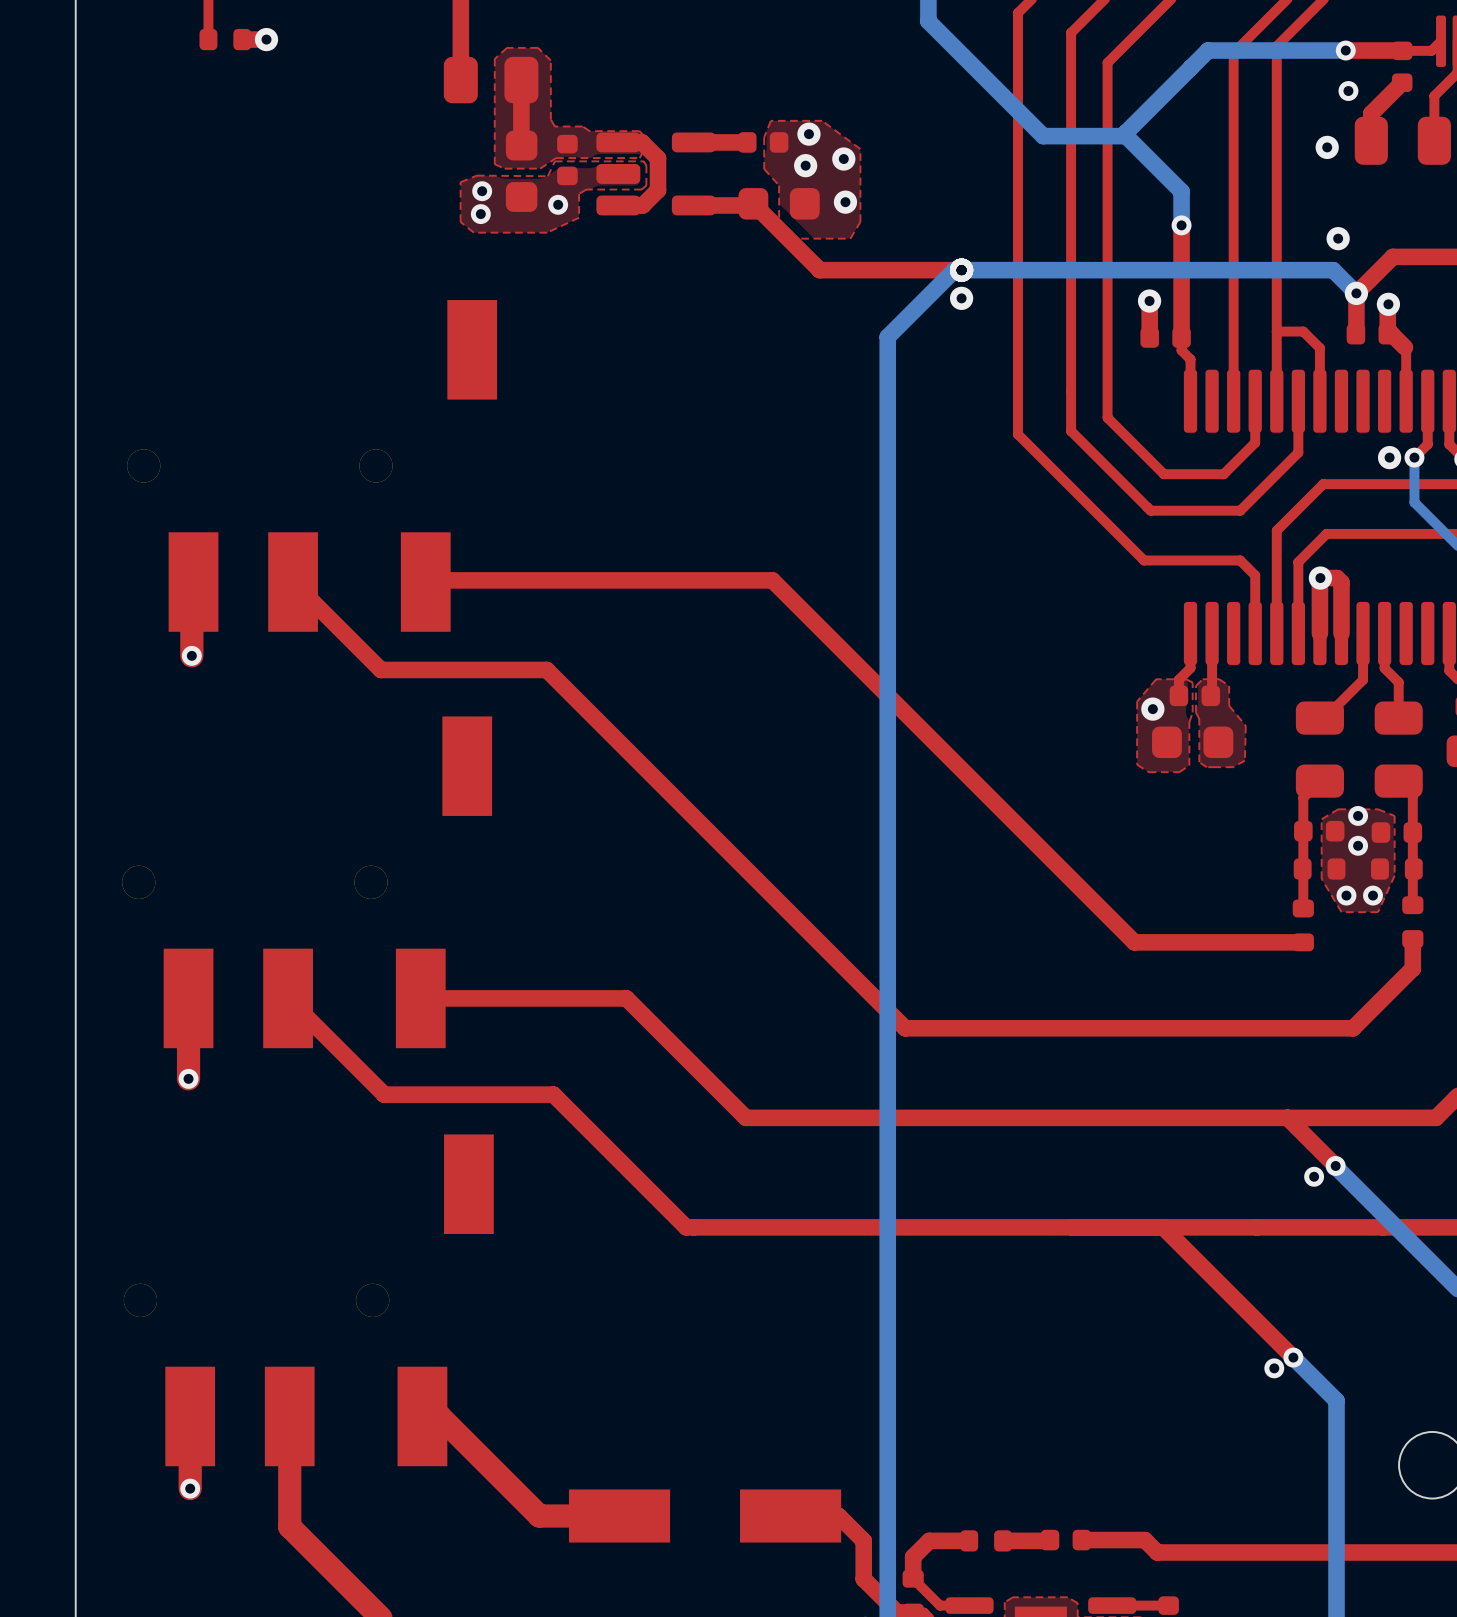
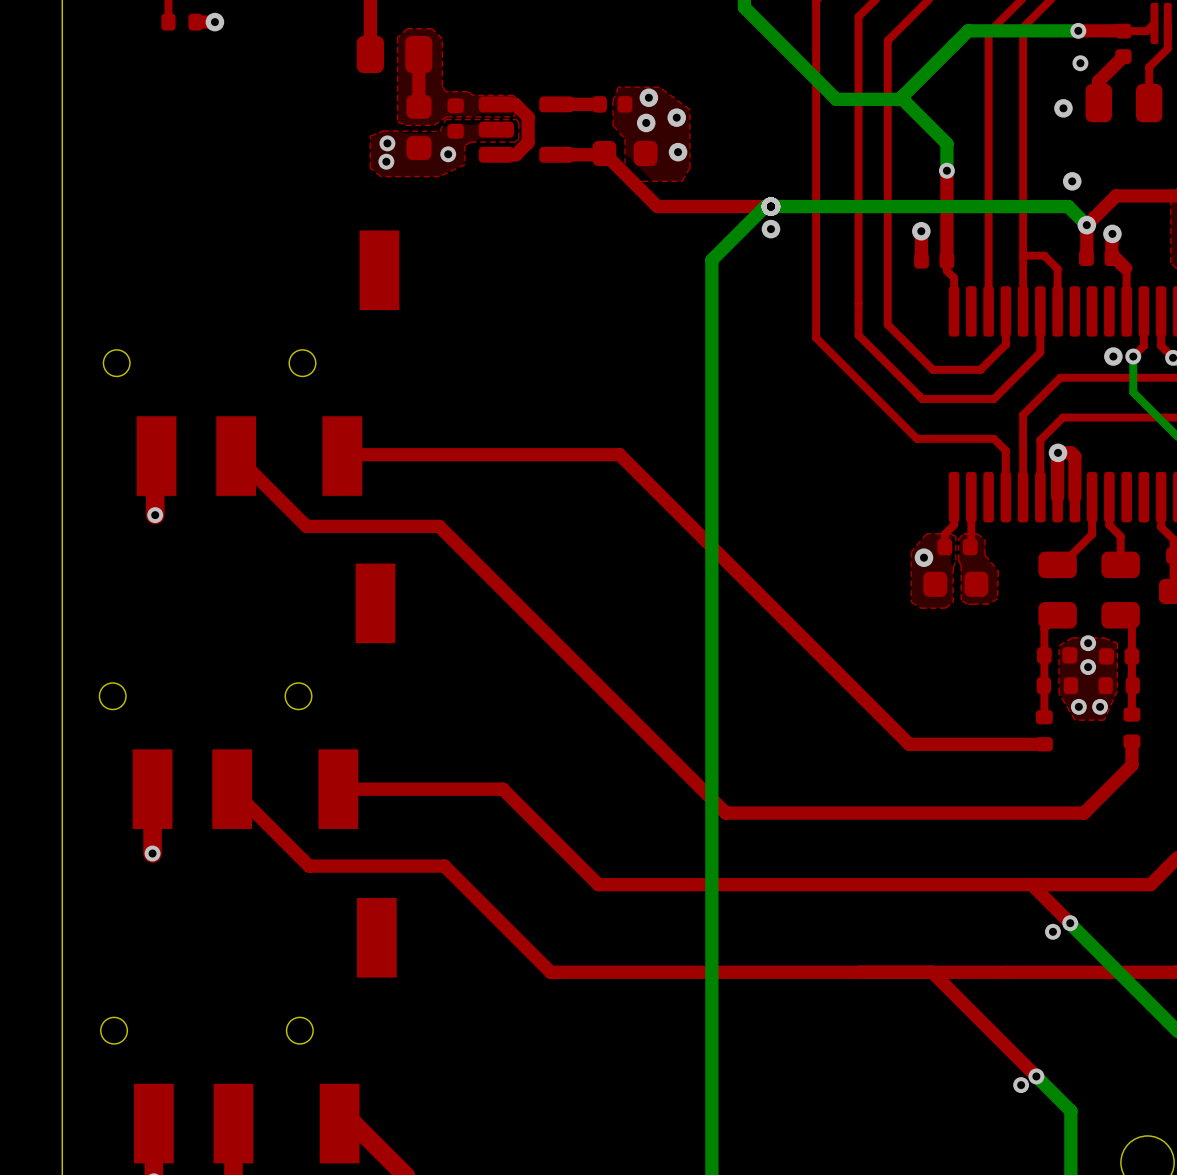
part footprint: [127, 300, 498, 632] -> [103, 230, 400, 496]
part footprint: [122, 716, 493, 1049] -> [99, 563, 396, 829]
part footprint: [123, 1134, 494, 1467] -> [100, 897, 397, 1164]

